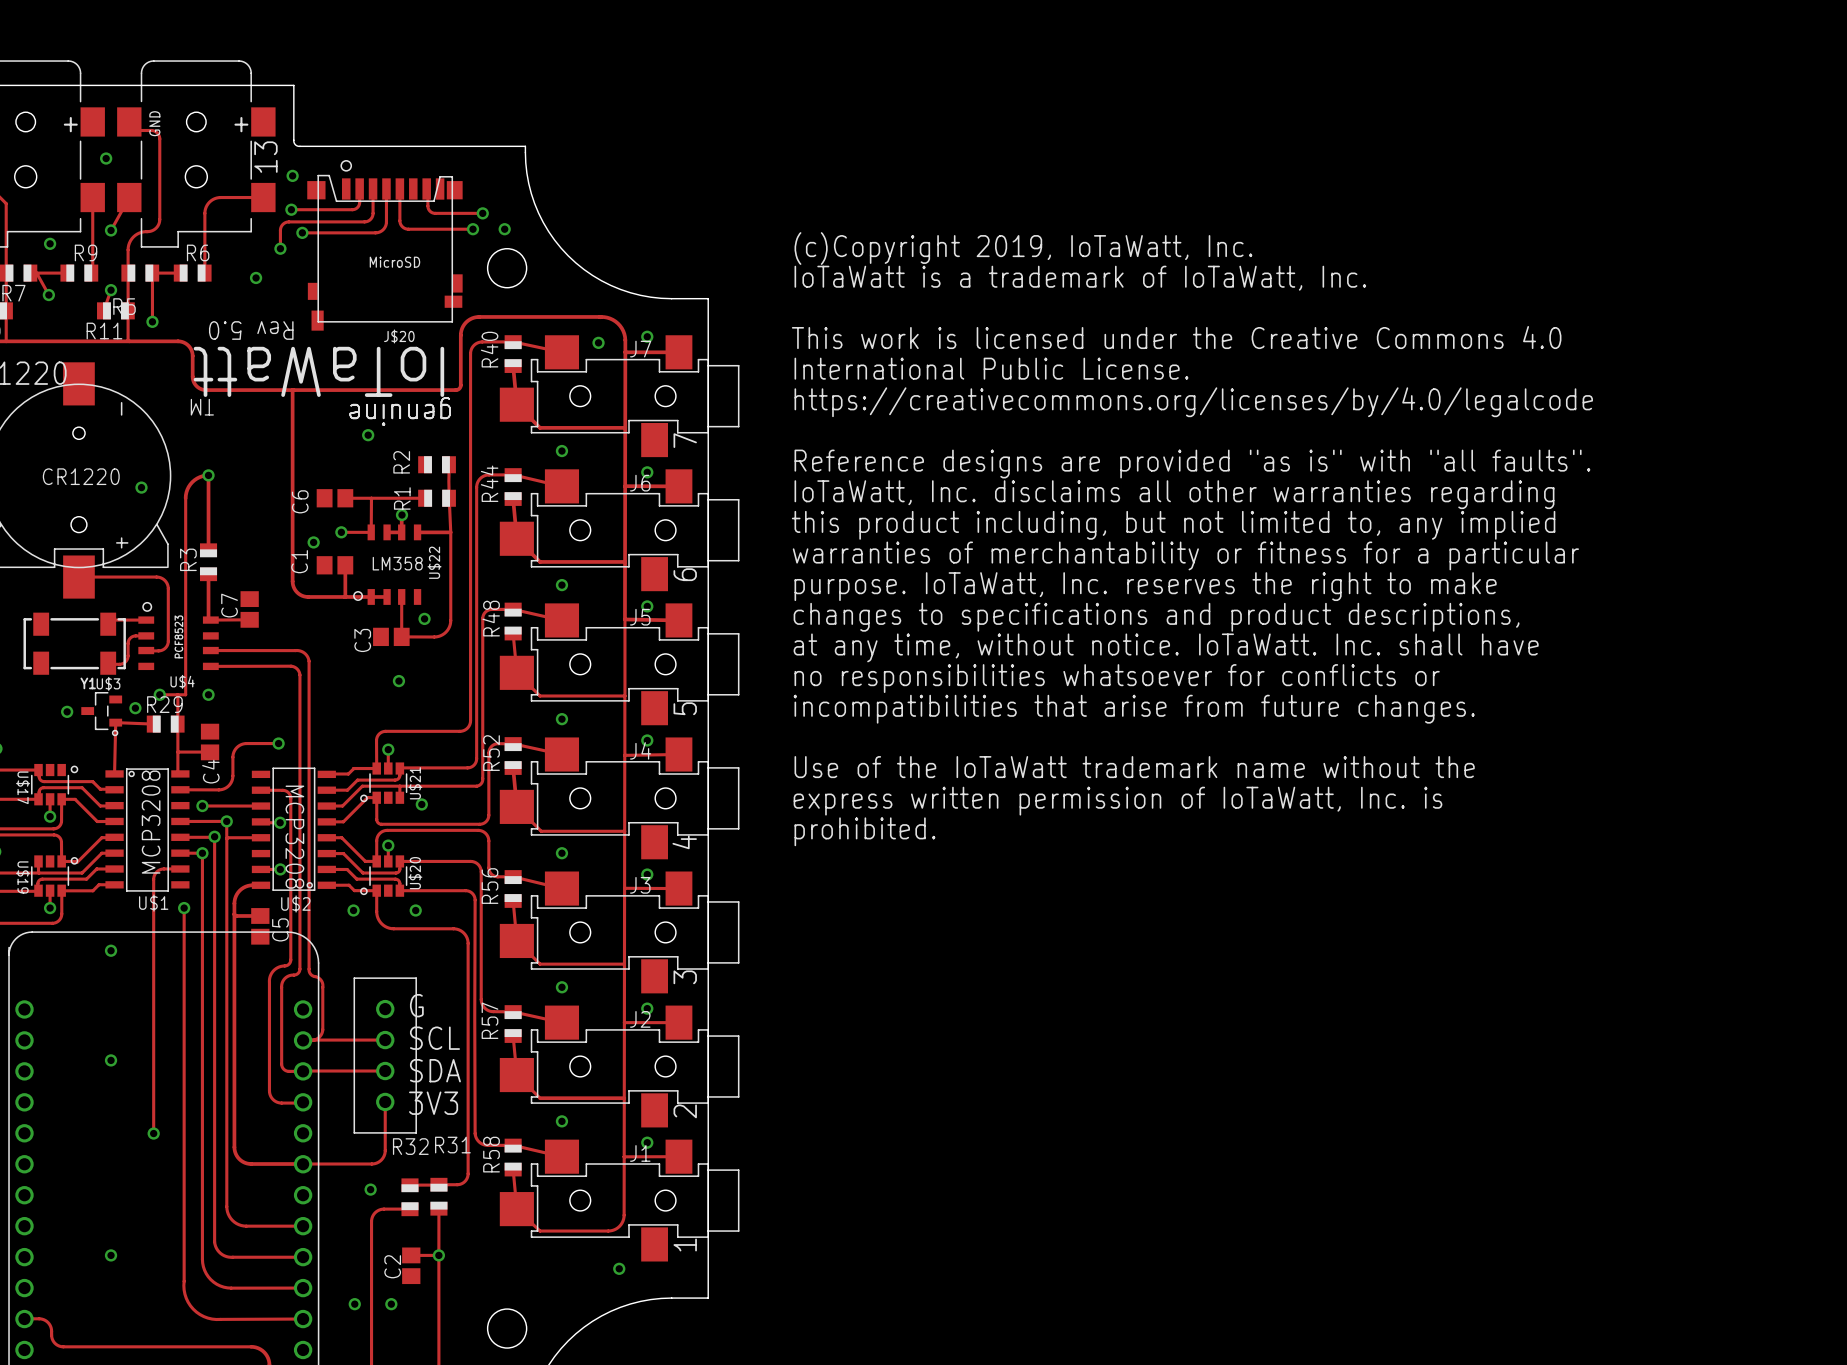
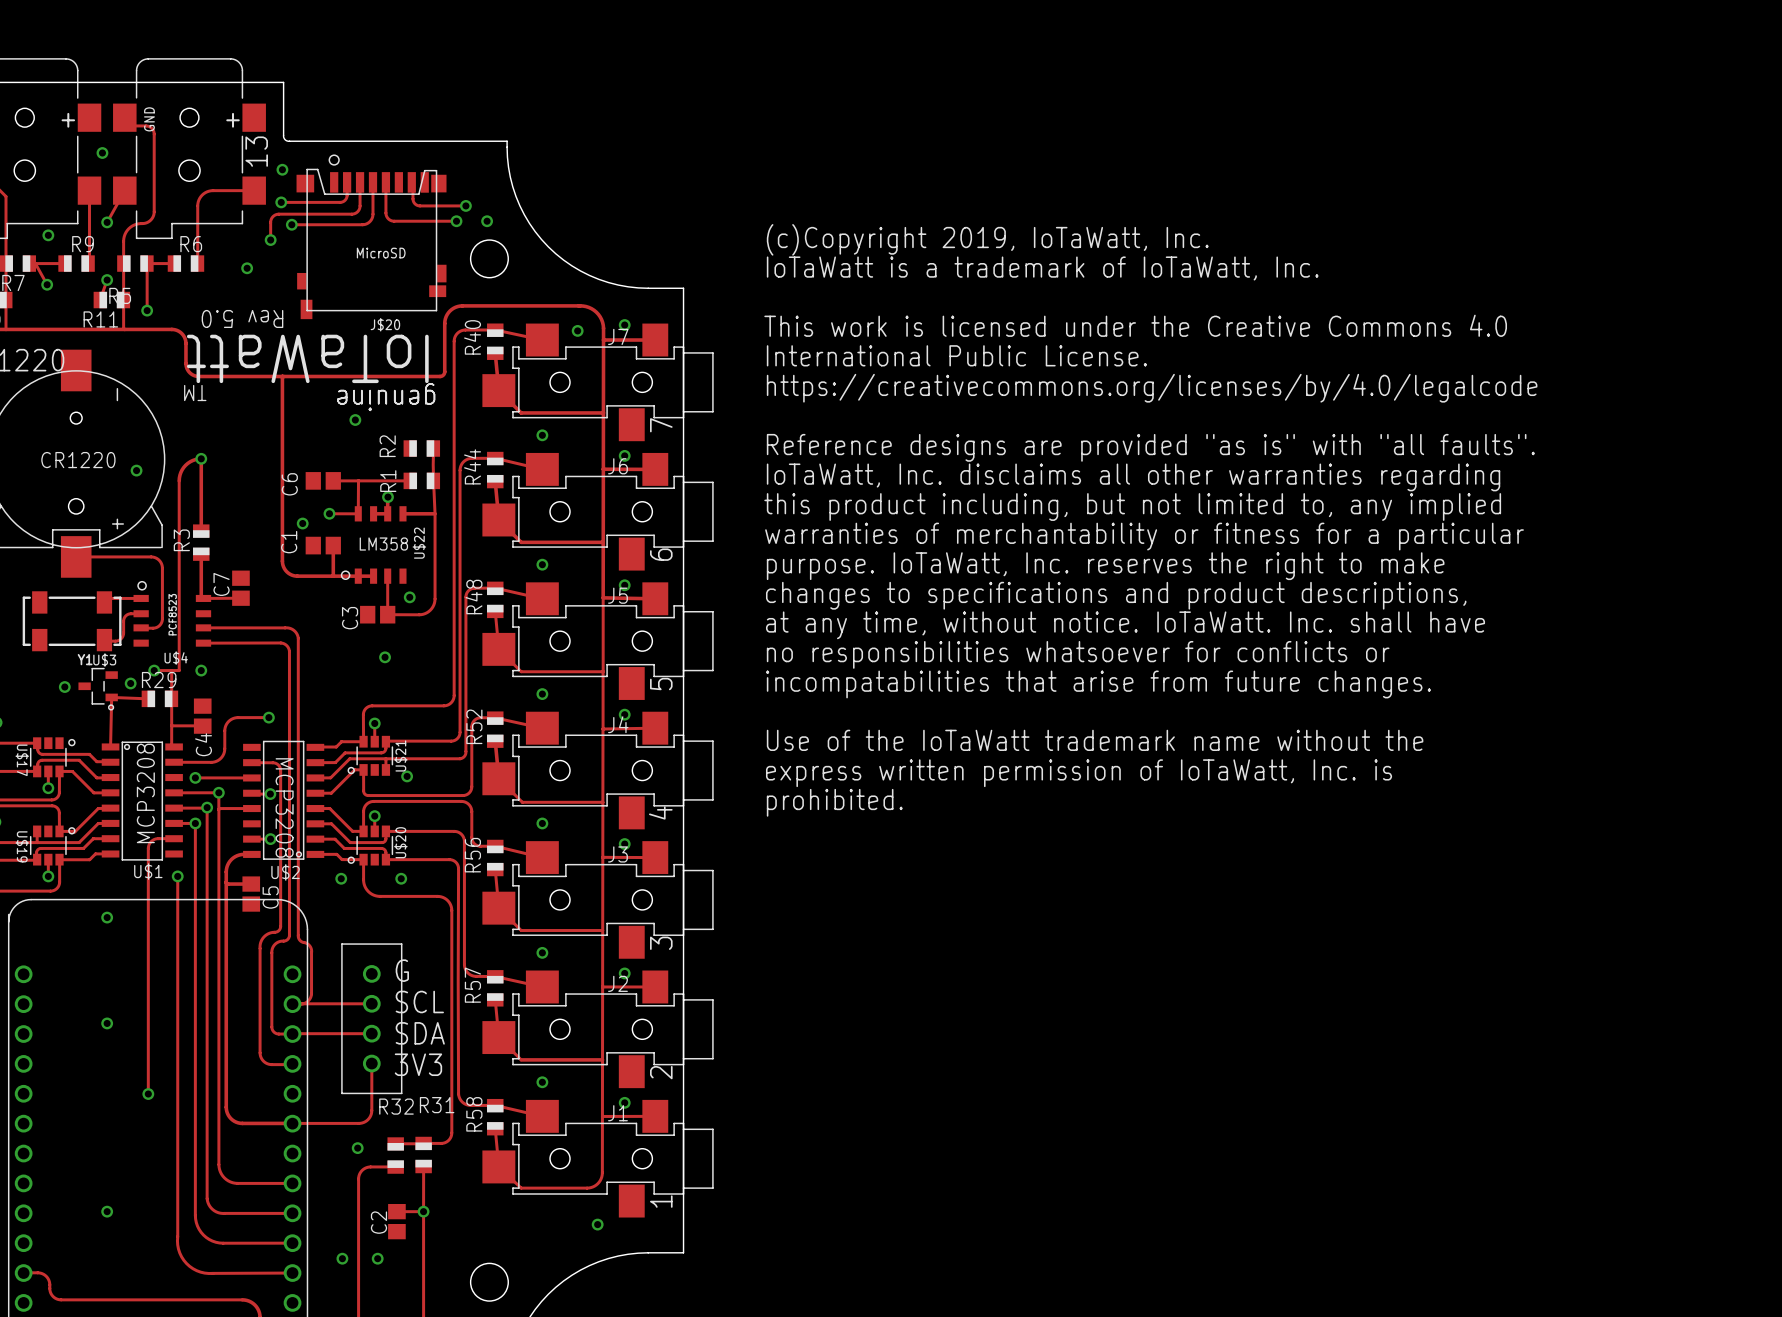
text: incompatibilities that arise from future changes. (1134, 709) -> incompatabilities that arise from future changes. (1098, 684)

